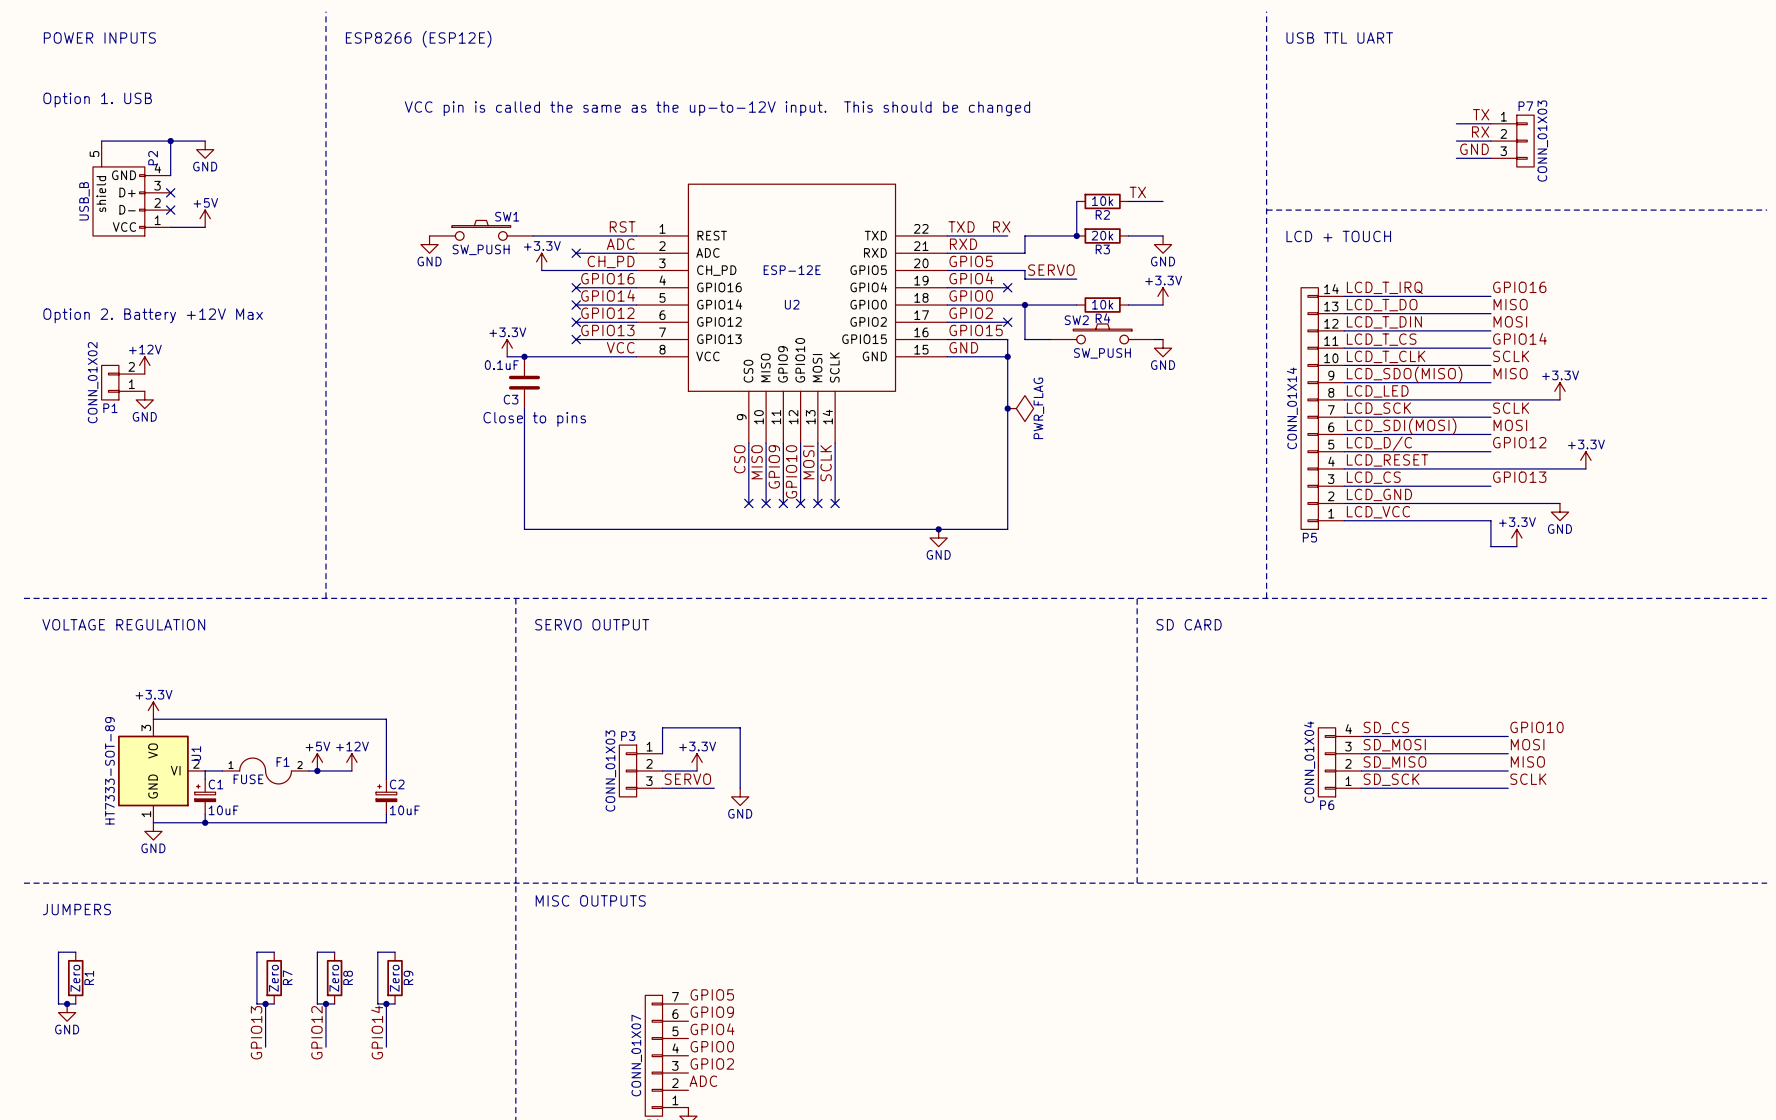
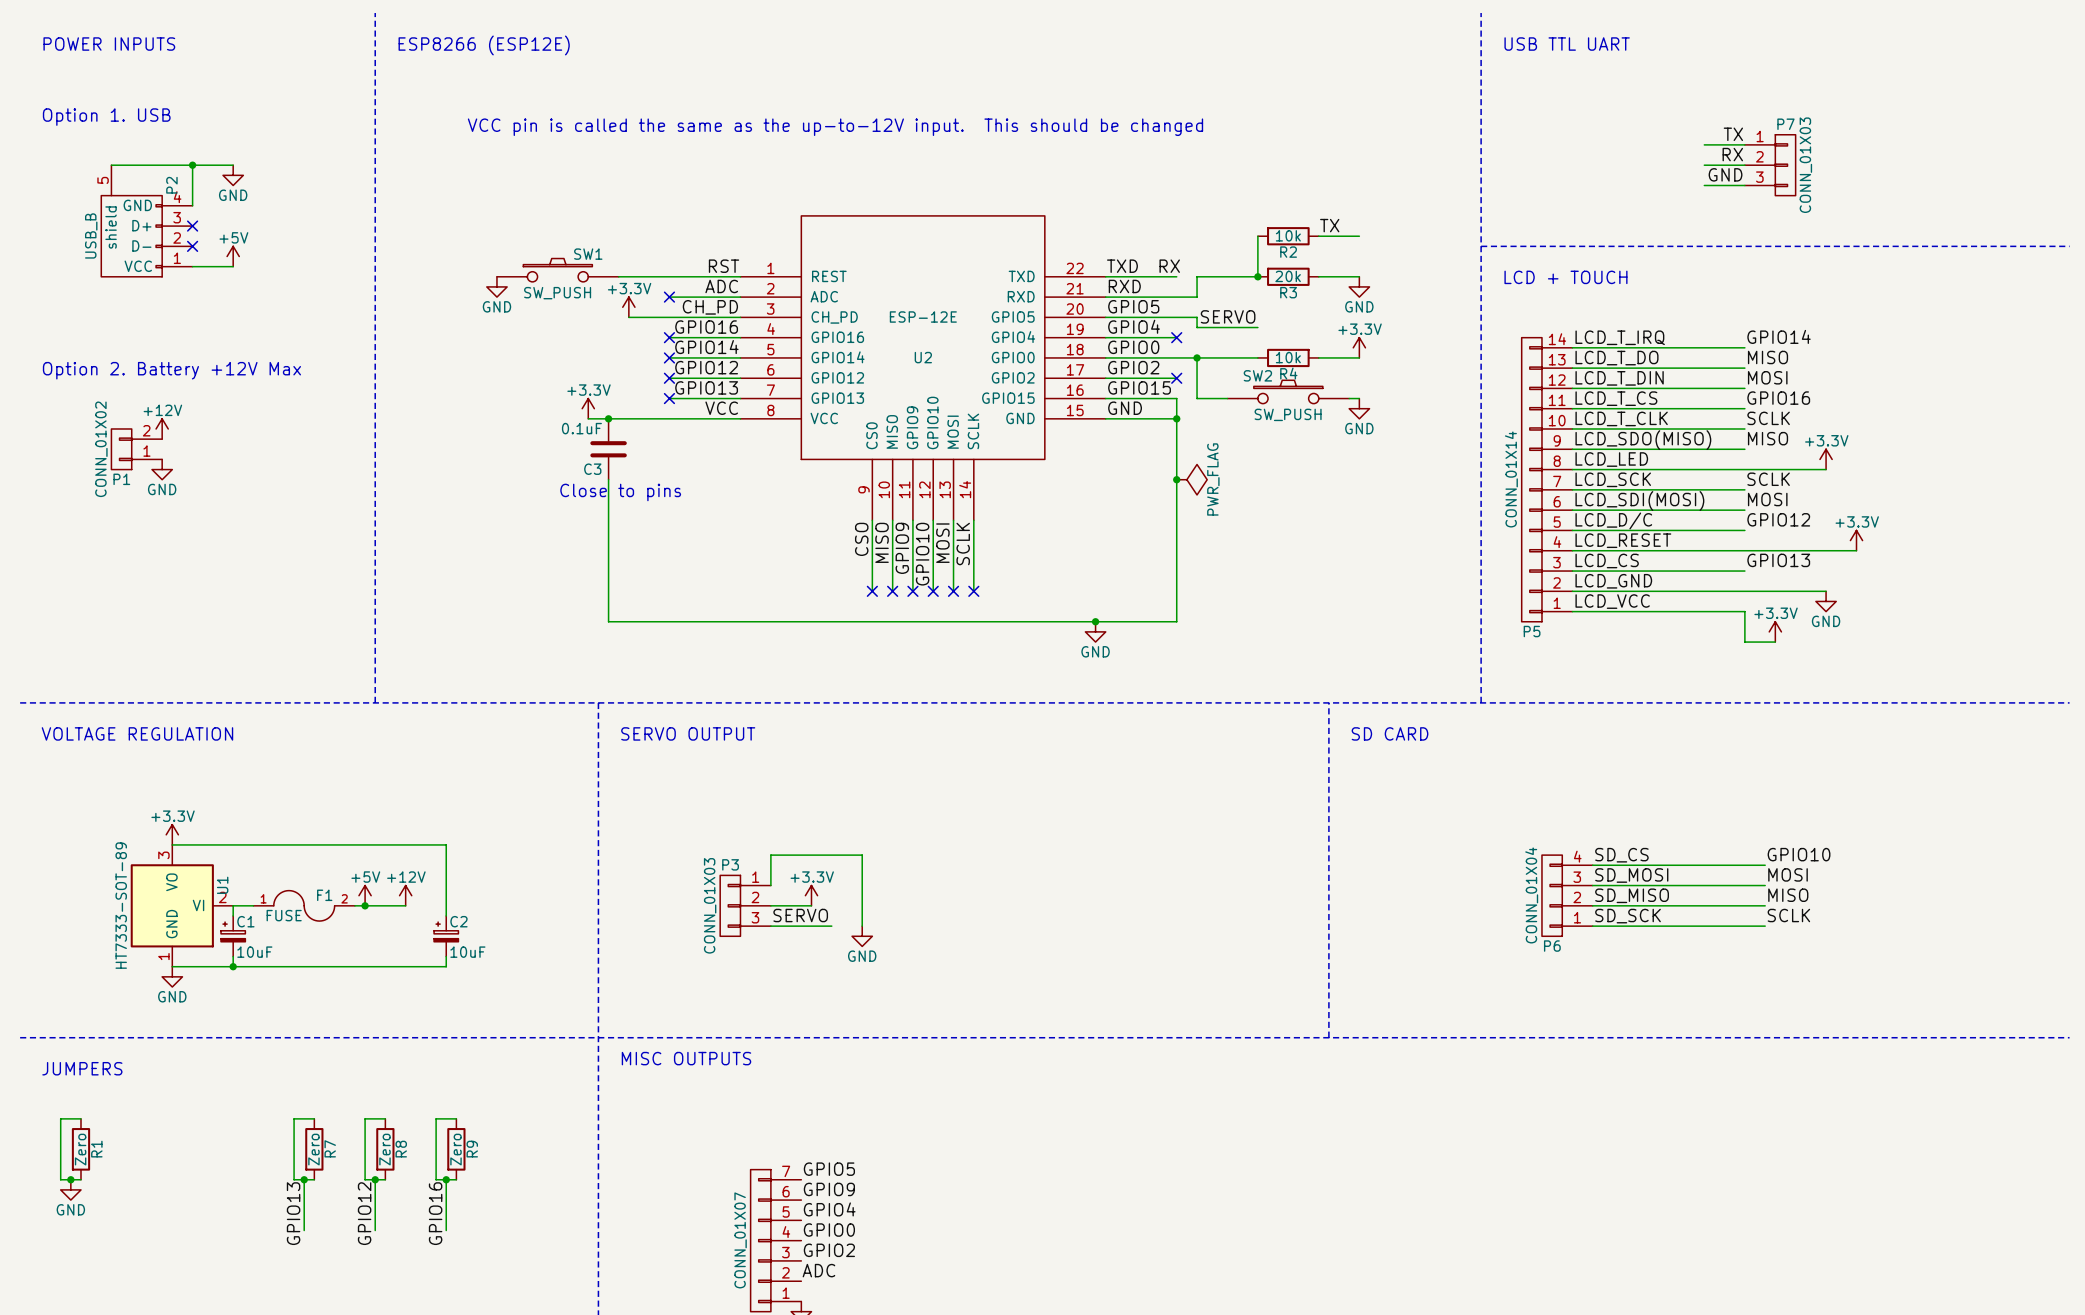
label: GPIO16 (1519, 287) -> GPIO14 (1779, 336)
label: GPIO14 (1519, 338) -> GPIO16 (1778, 398)
label: GPIO14 (377, 1032) -> GPIO16 (435, 1213)

